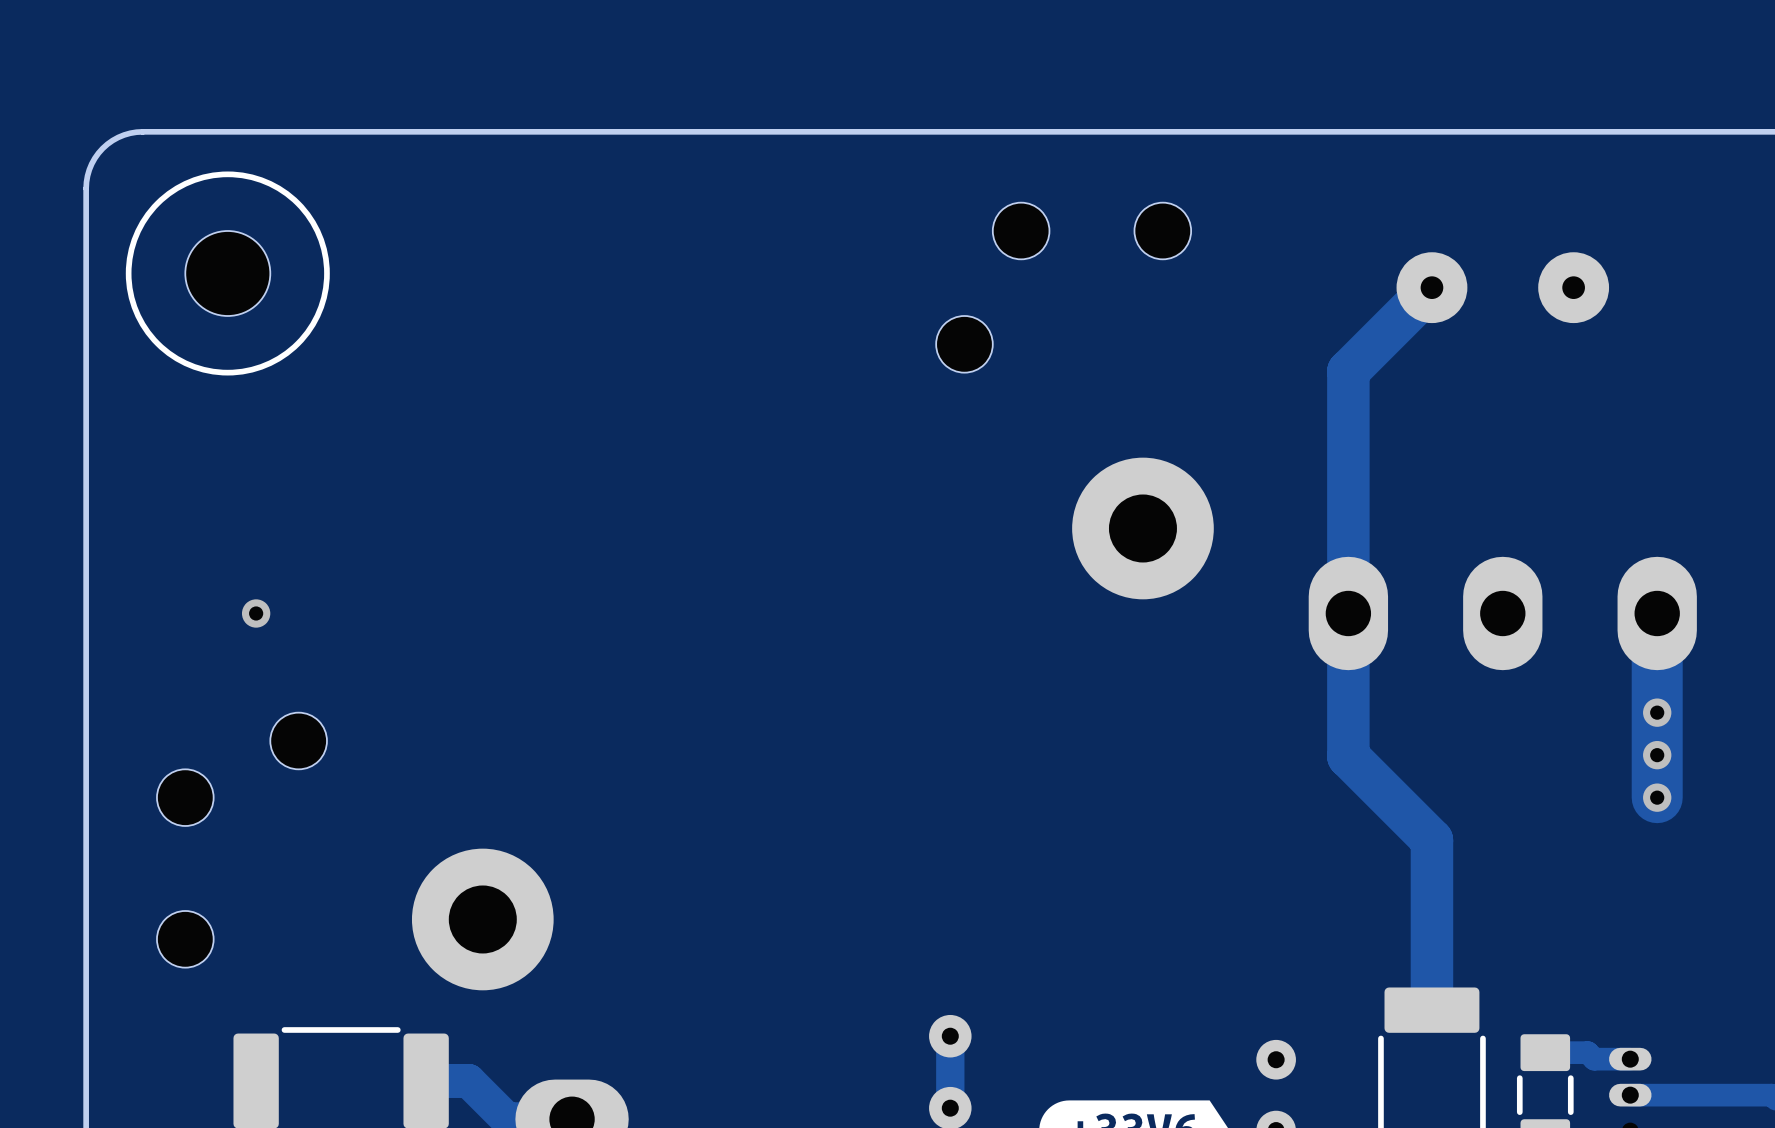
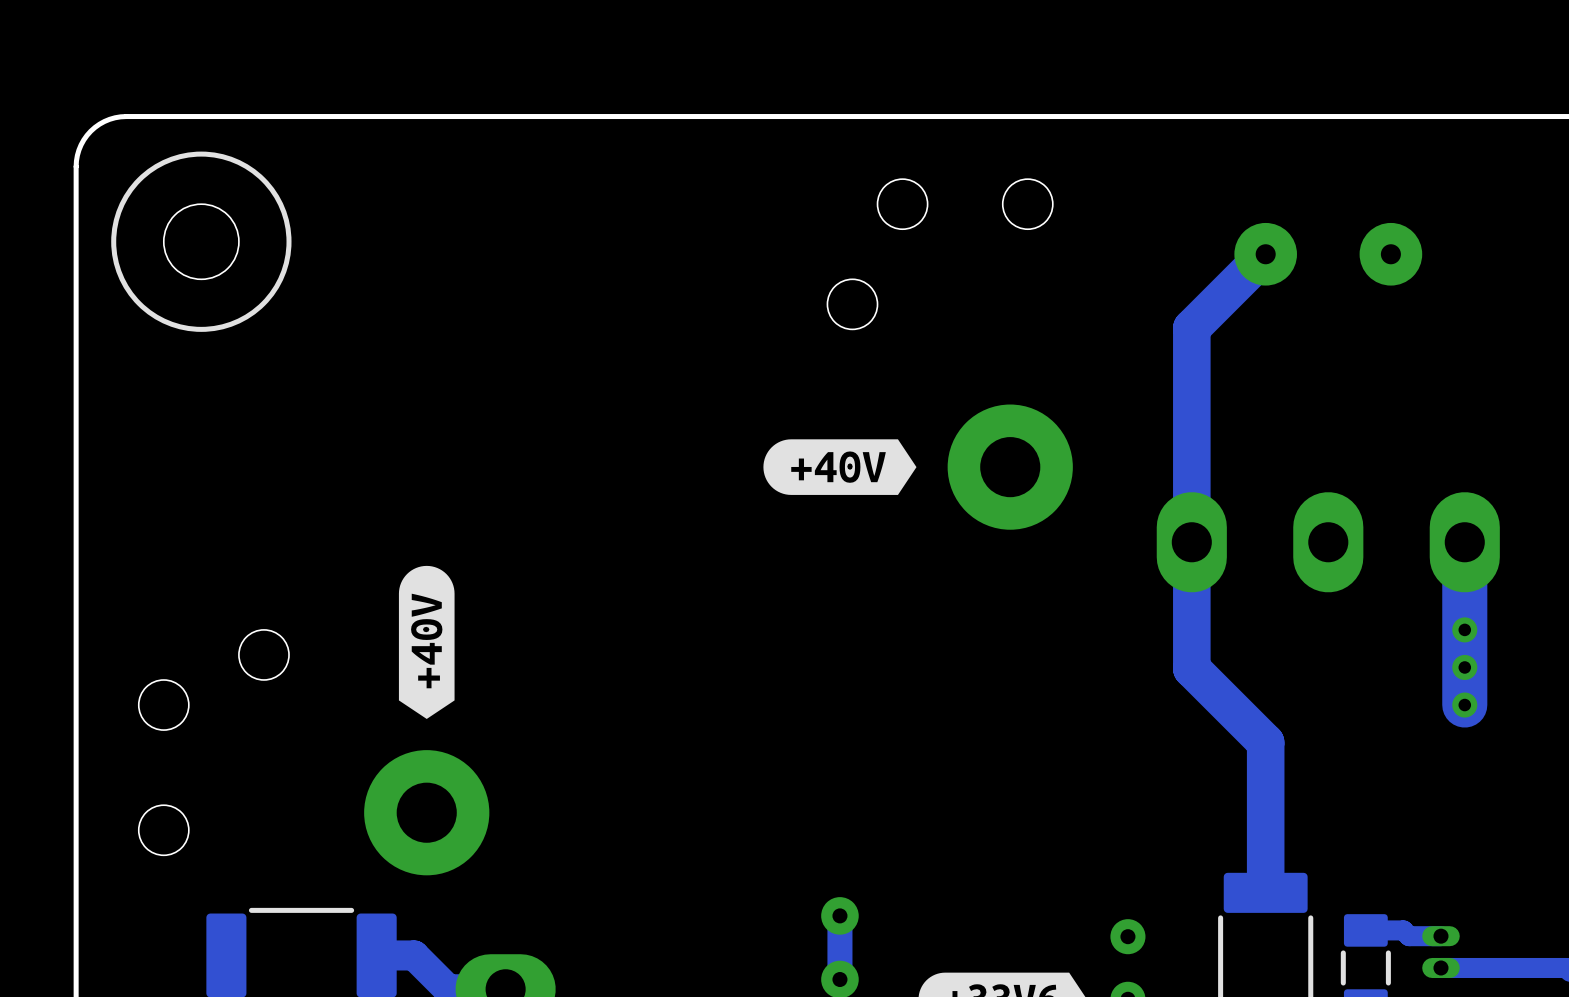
drawing: none -> [763, 439, 917, 495]
via: (256, 613) -> none
drawing: none -> [398, 565, 455, 719]

